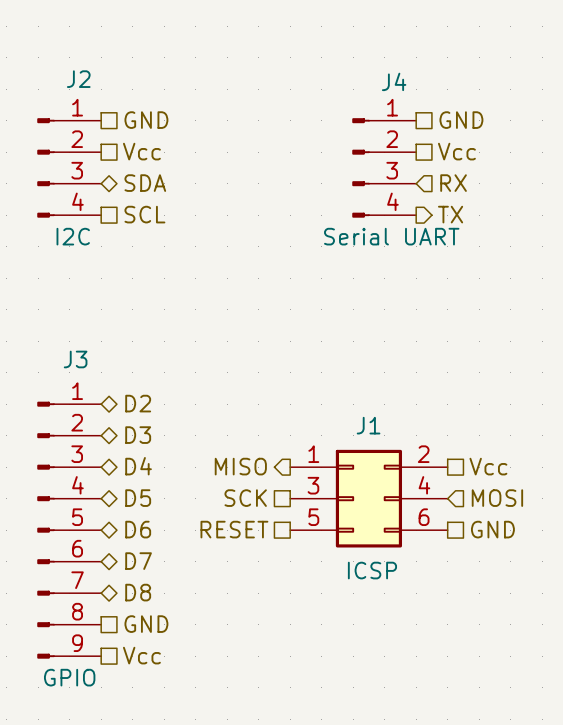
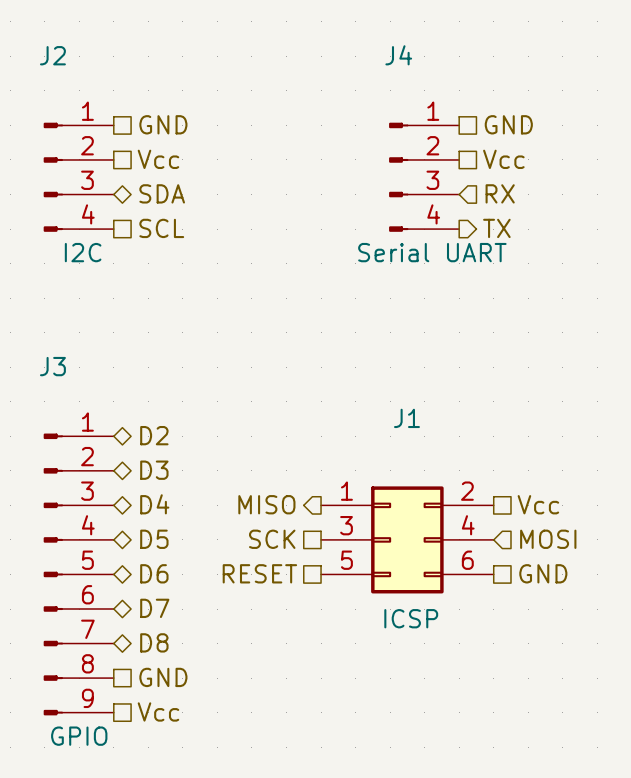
J2 name position: J2 (78, 79) -> J2 (52, 55)
J4 name position: J4 (394, 81) -> J4 (398, 55)
J3 name position: J3 (75, 359) -> J3 (52, 366)
J1 name position: J1 (368, 425) -> J1 (406, 418)

